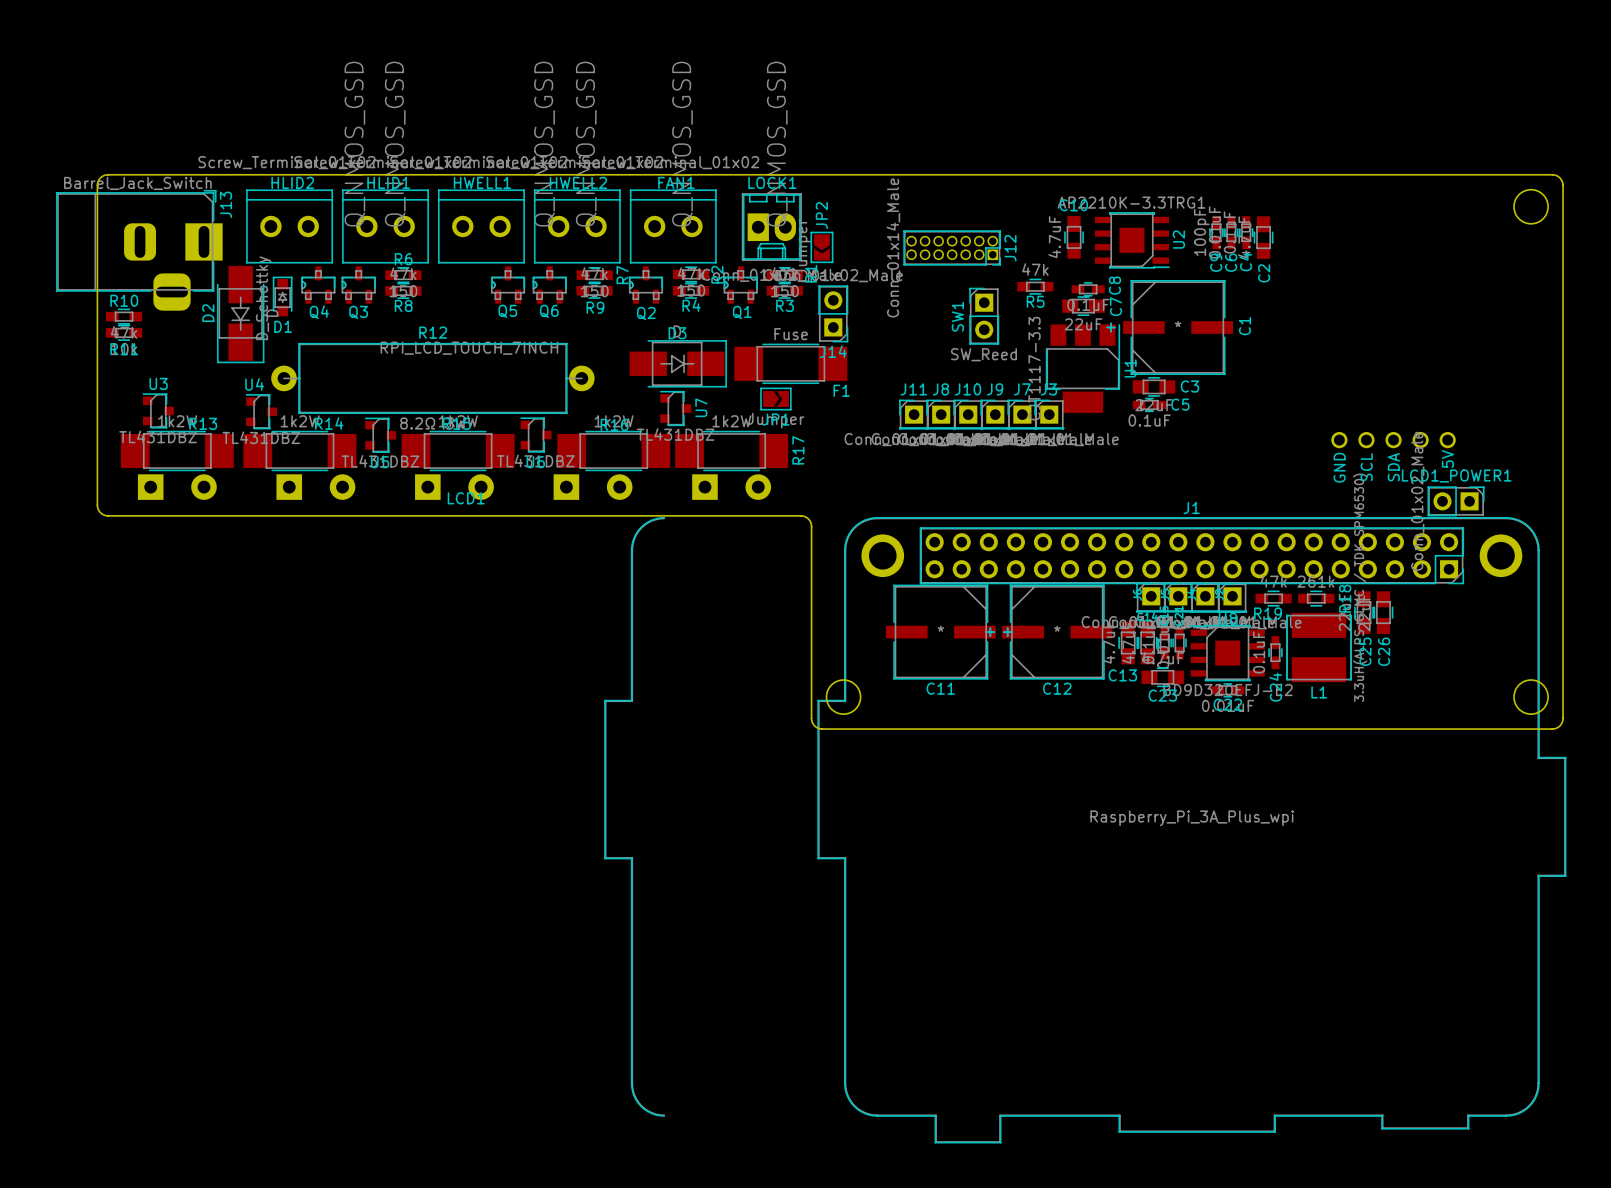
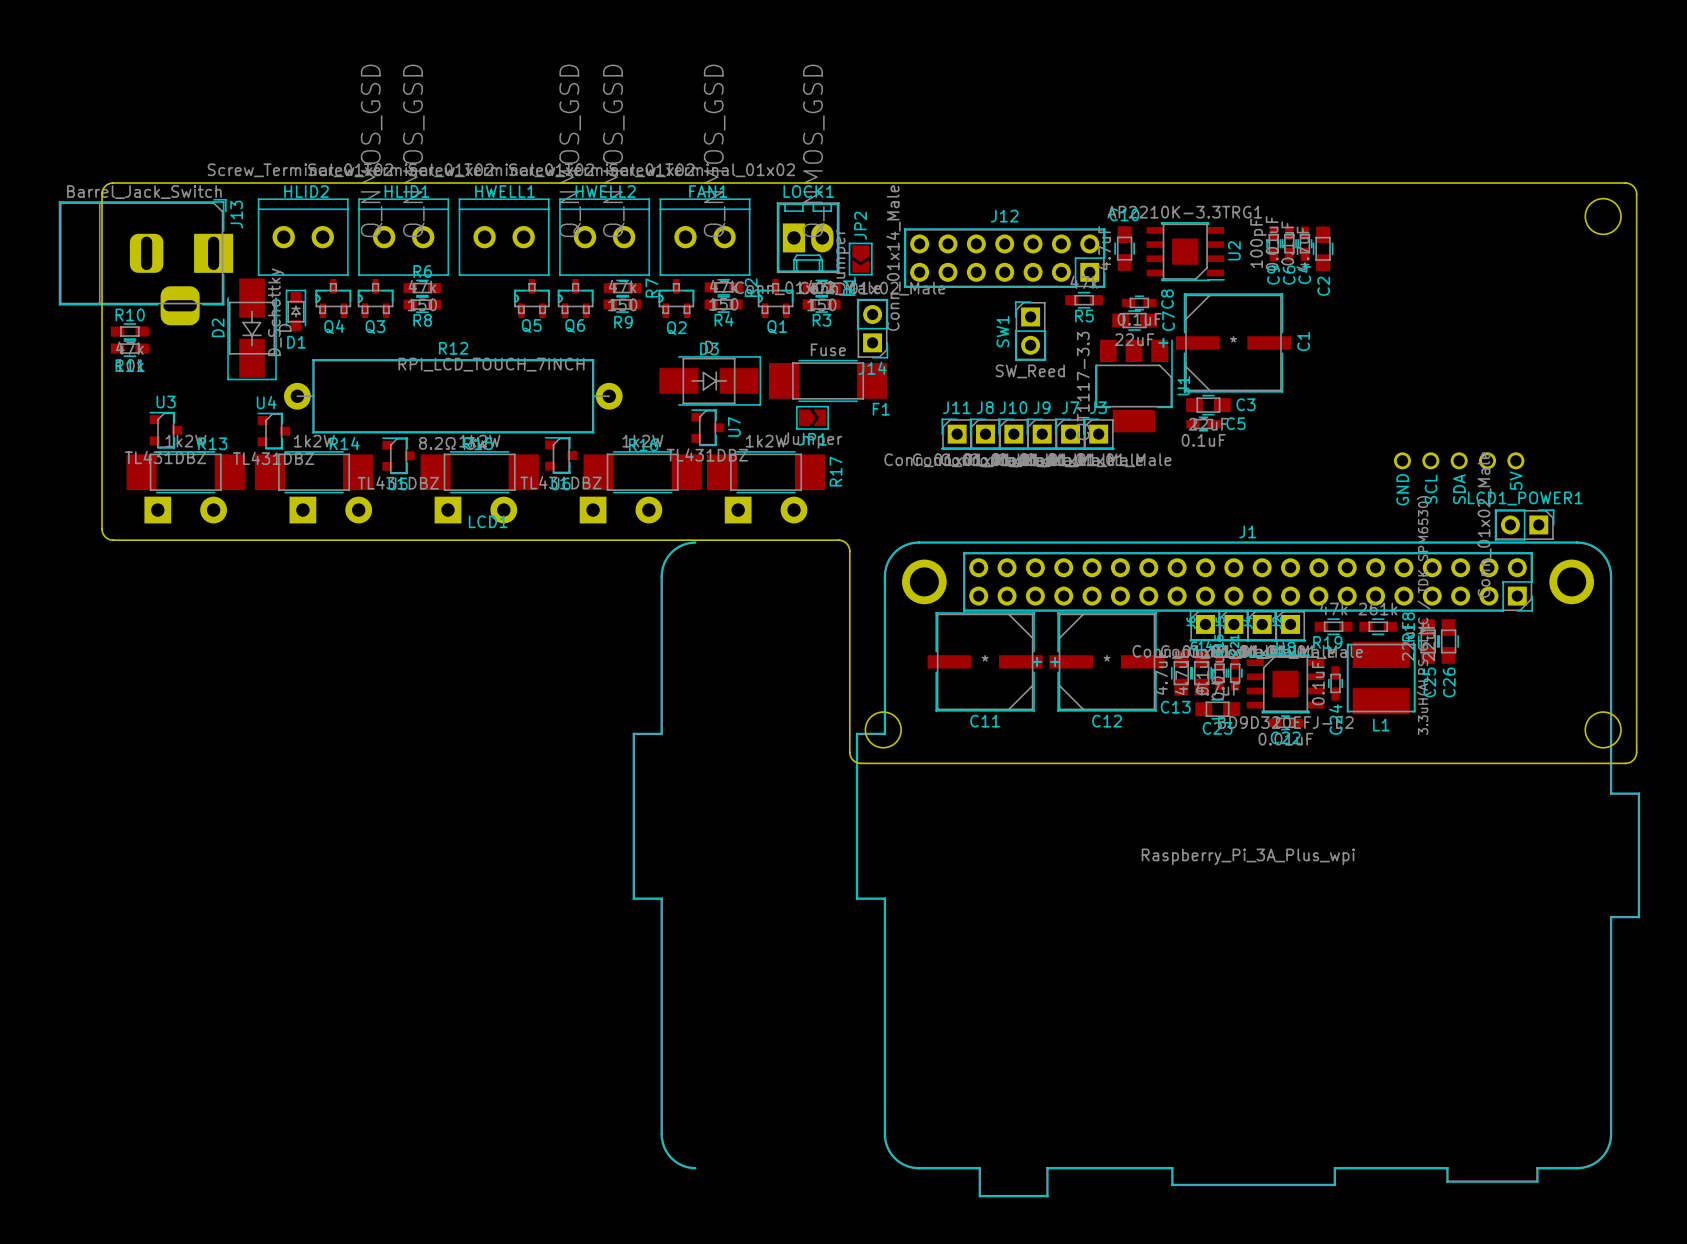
J12 footprint: [903, 230, 1001, 266] -> [904, 228, 1106, 288]
J12 value position: Conn_01x14_Male (893, 247) -> Conn_01x14_Male (893, 258)
J12 name position: J12 (1010, 248) -> J12 (1004, 216)

